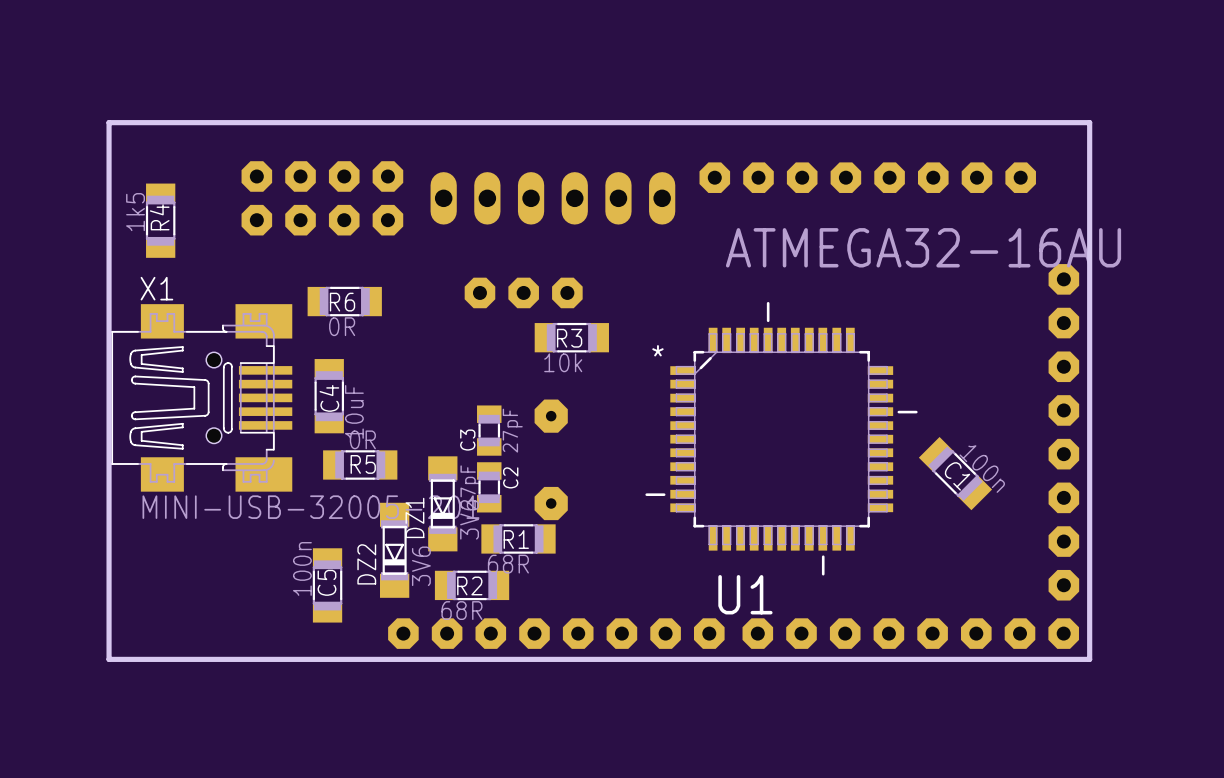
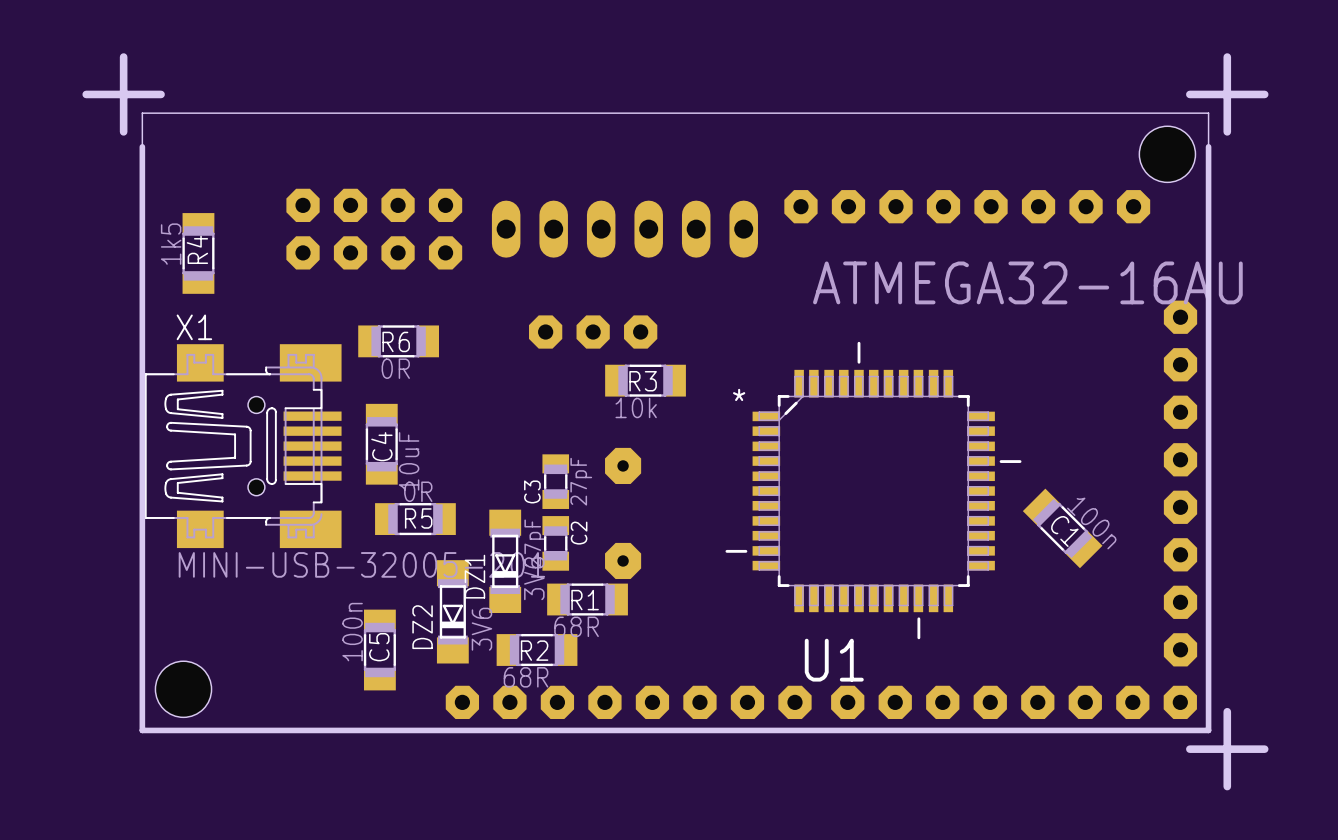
board edge: none -> (123, 57) (123, 131)
board edge: none -> (1227, 57) (1227, 131)
board edge: none -> (161, 94) (86, 94)
board edge: none -> (1264, 94) (1189, 94)
board edge: (1089, 122) (109, 122) -> (1208, 146) (1208, 113) (142, 113) (142, 146)
hole: none -> (1167, 154)
hole: none -> (183, 689)
board edge: none -> (1227, 711) (1227, 786)
board edge: none -> (1264, 749) (1189, 749)

